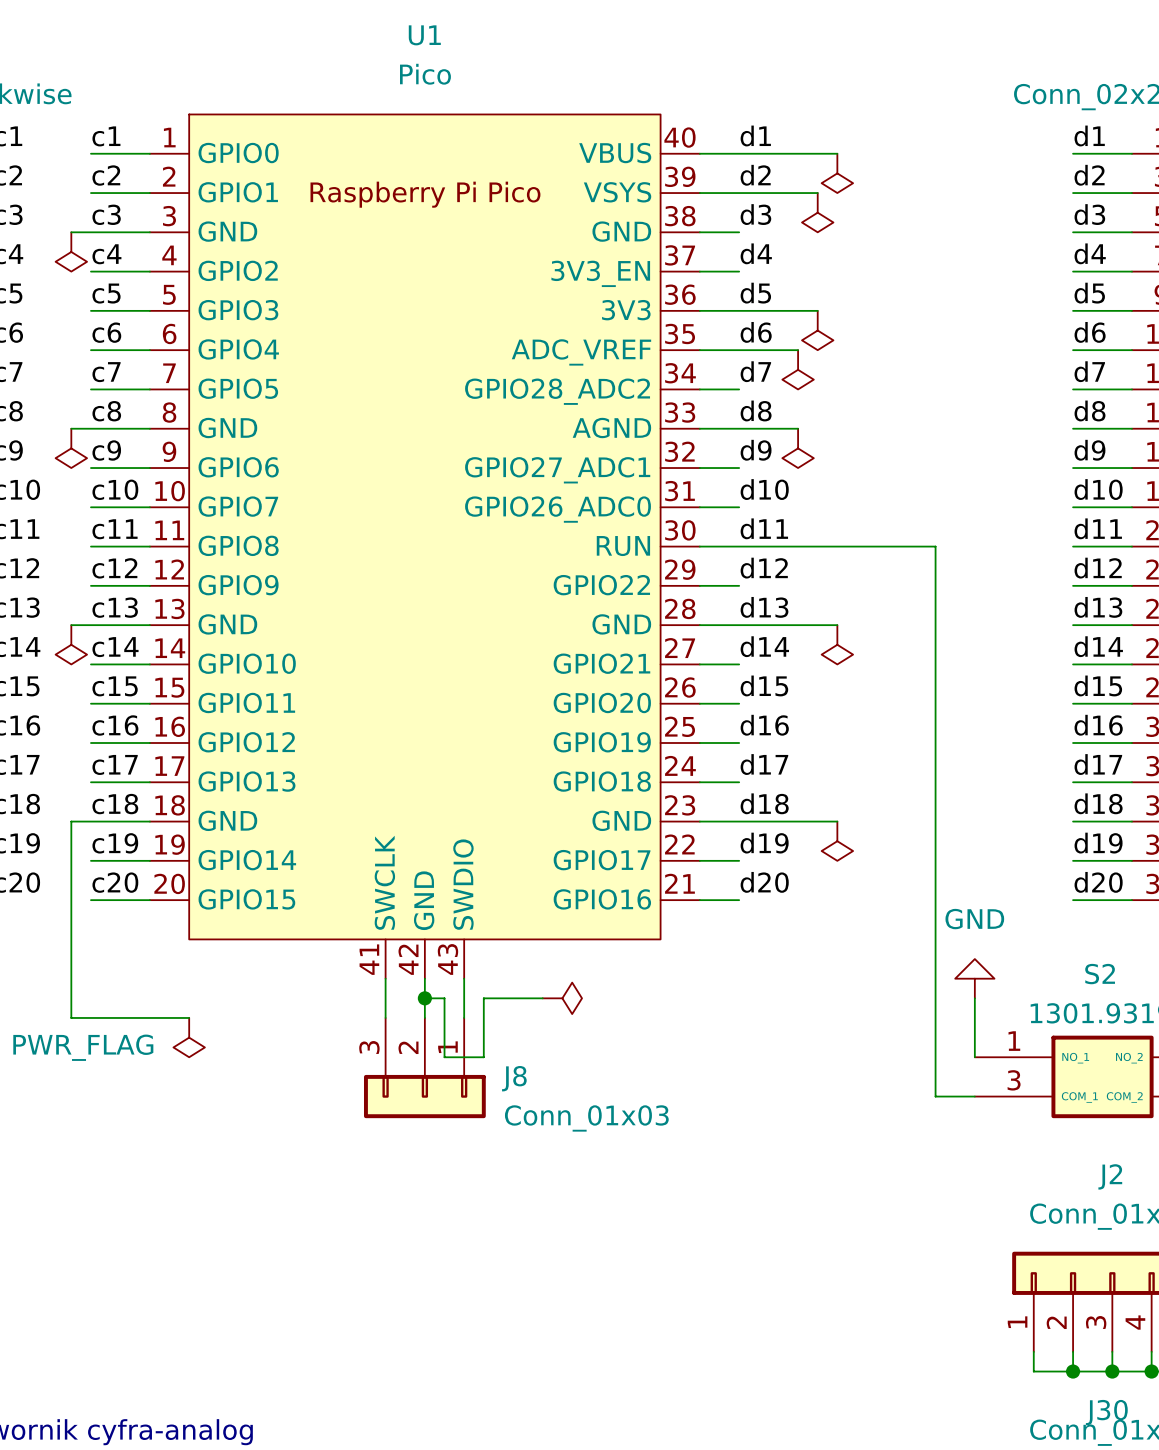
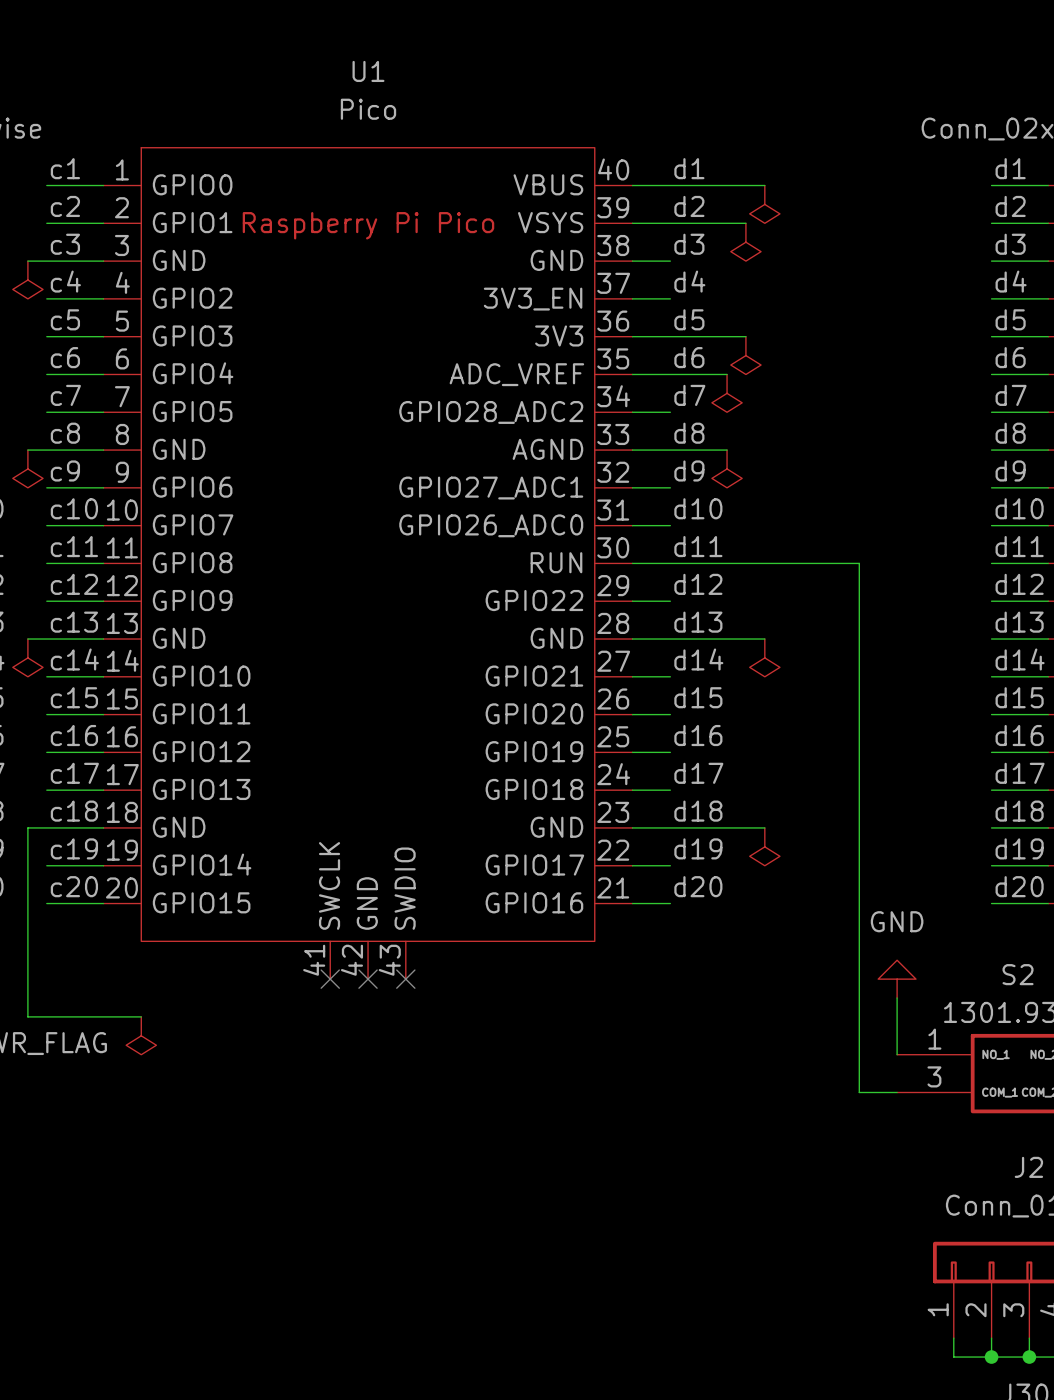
wire: (385, 978) (385, 1017) -> none
no-connect mark: none -> (330, 979)
wire: (424, 978) (424, 1017) -> none
no-connect mark: none -> (368, 979)
wire: (464, 978) (464, 1017) -> none
no-connect mark: none -> (405, 979)
wire: (424, 998) (444, 998) (444, 1057) (483, 1057) (483, 998) (542, 998) -> none
junction: (424, 998) -> none
power symbol: (562, 998) -> none
J8: Conn_01x03 (424, 1068) -> none

